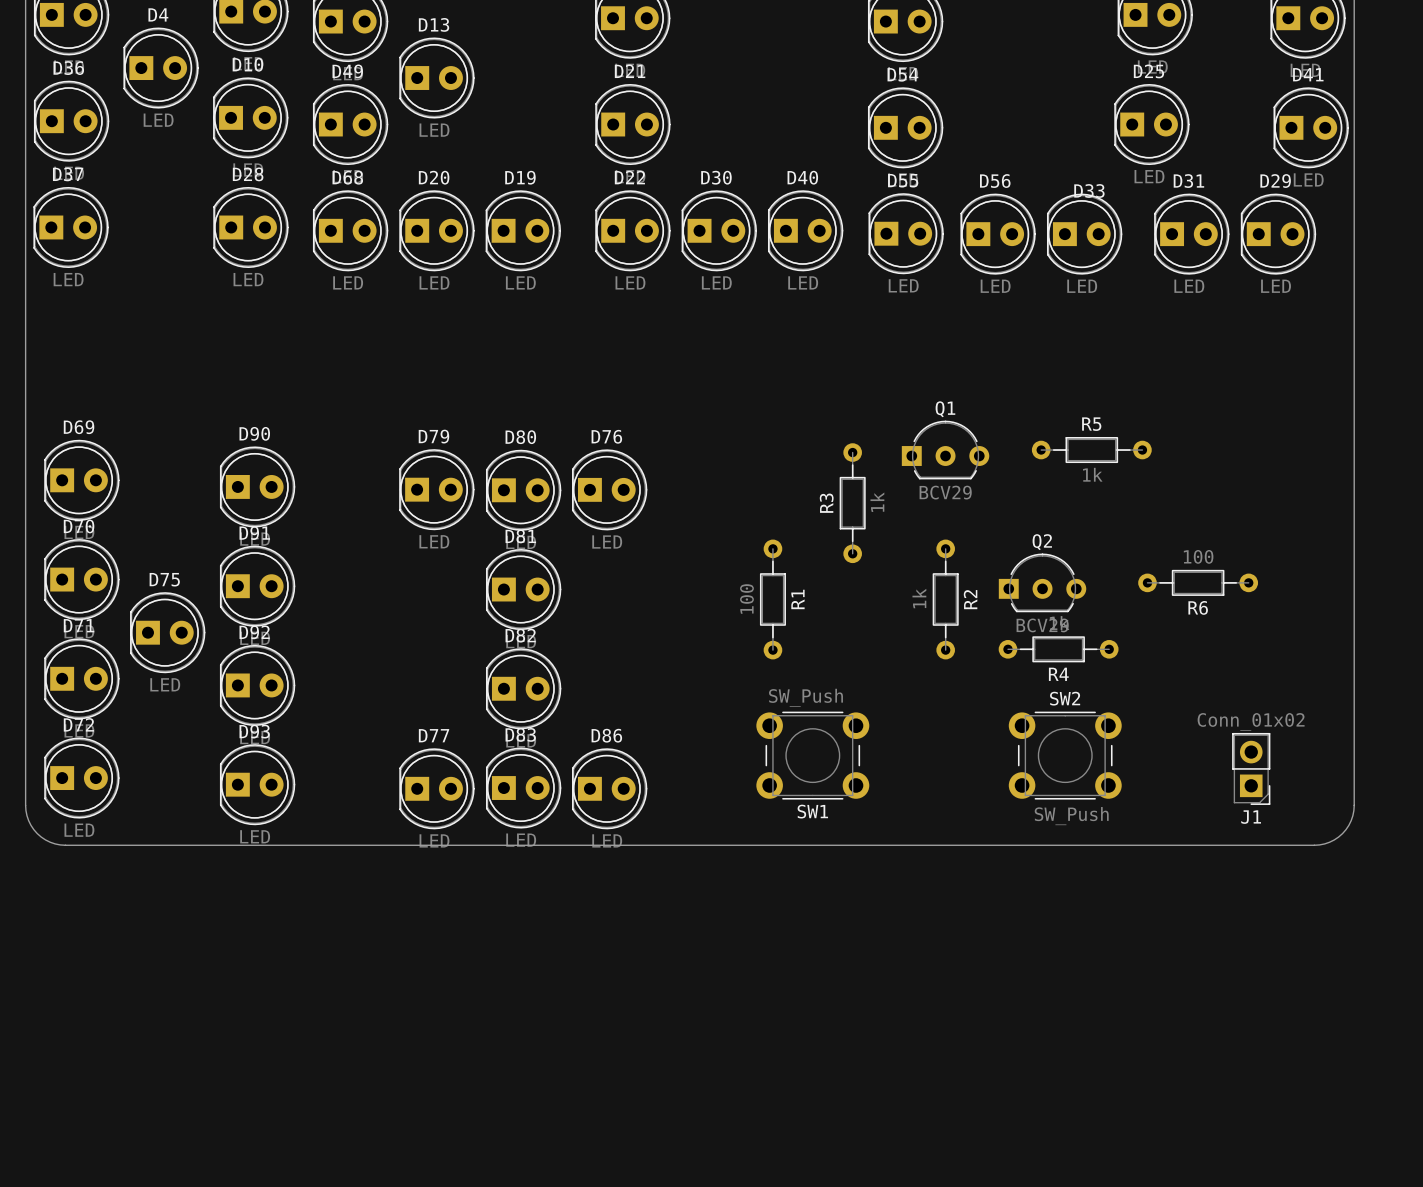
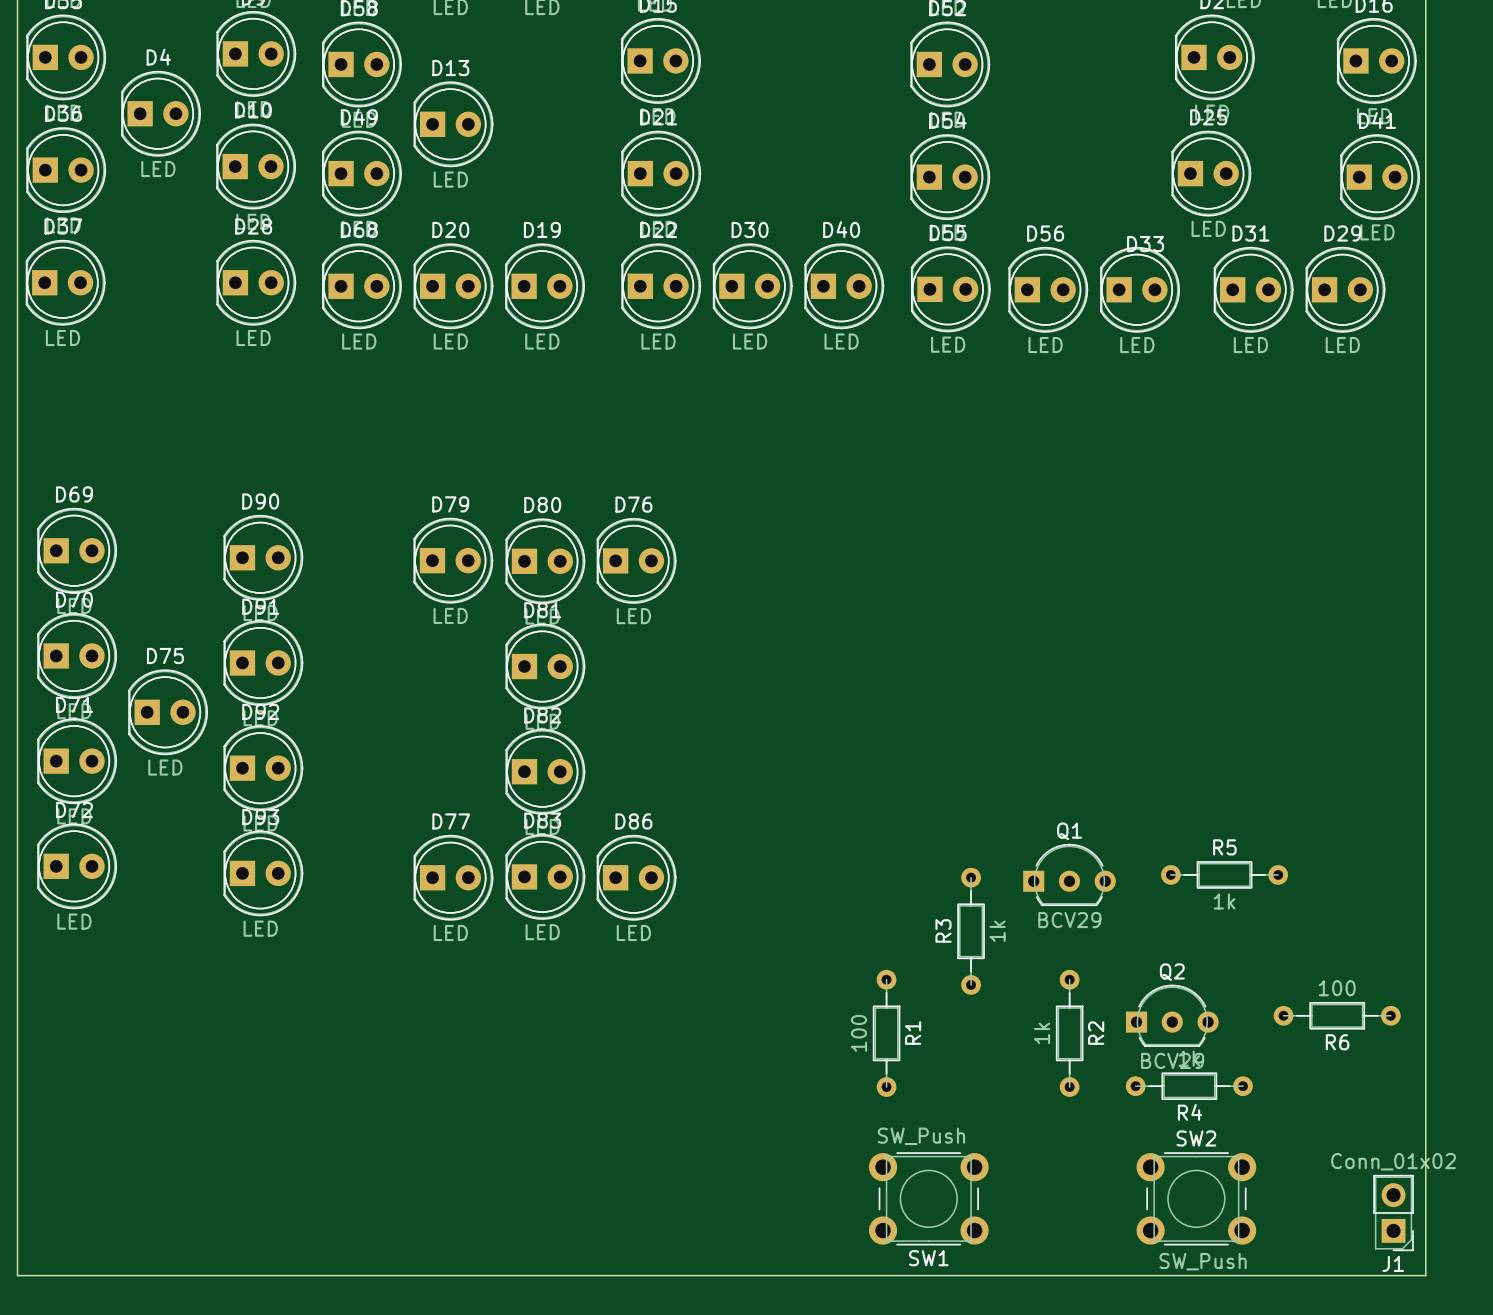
Q1 position: (945, 450) -> (1069, 874)
R5 position: (1091, 450) -> (1224, 874)
R3 position: (852, 503) -> (971, 931)
Q2 position: (1042, 582) -> (1172, 1015)
R6 position: (1198, 582) -> (1337, 1015)
R1 position: (772, 599) -> (886, 1033)
R2 position: (945, 599) -> (1069, 1033)
R4 position: (1058, 649) -> (1189, 1086)
SW1 position: (812, 755) -> (928, 1198)
SW2 position: (1065, 755) -> (1196, 1198)
J1 position: (1251, 768) -> (1393, 1213)
board edge: (25, 805) (28, 820) (37, 833) (50, 842) (65, 845) (1314, 845) (1329, 842) (1342, 833) (1351, 820) (1354, 805) -> (17, 895) (17, 1275) (1425, 1275) (1425, 895)

